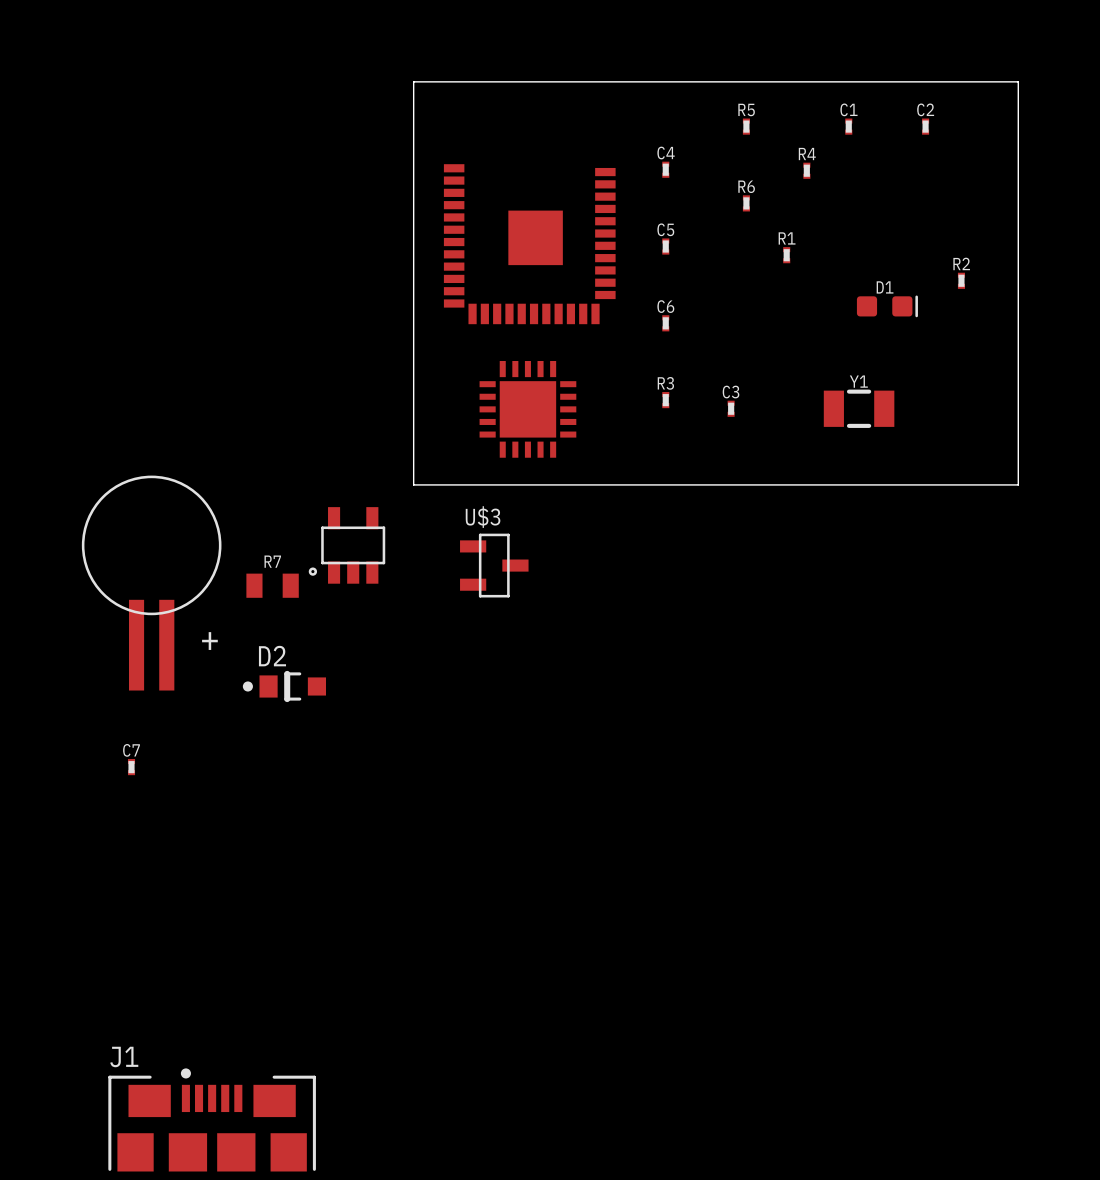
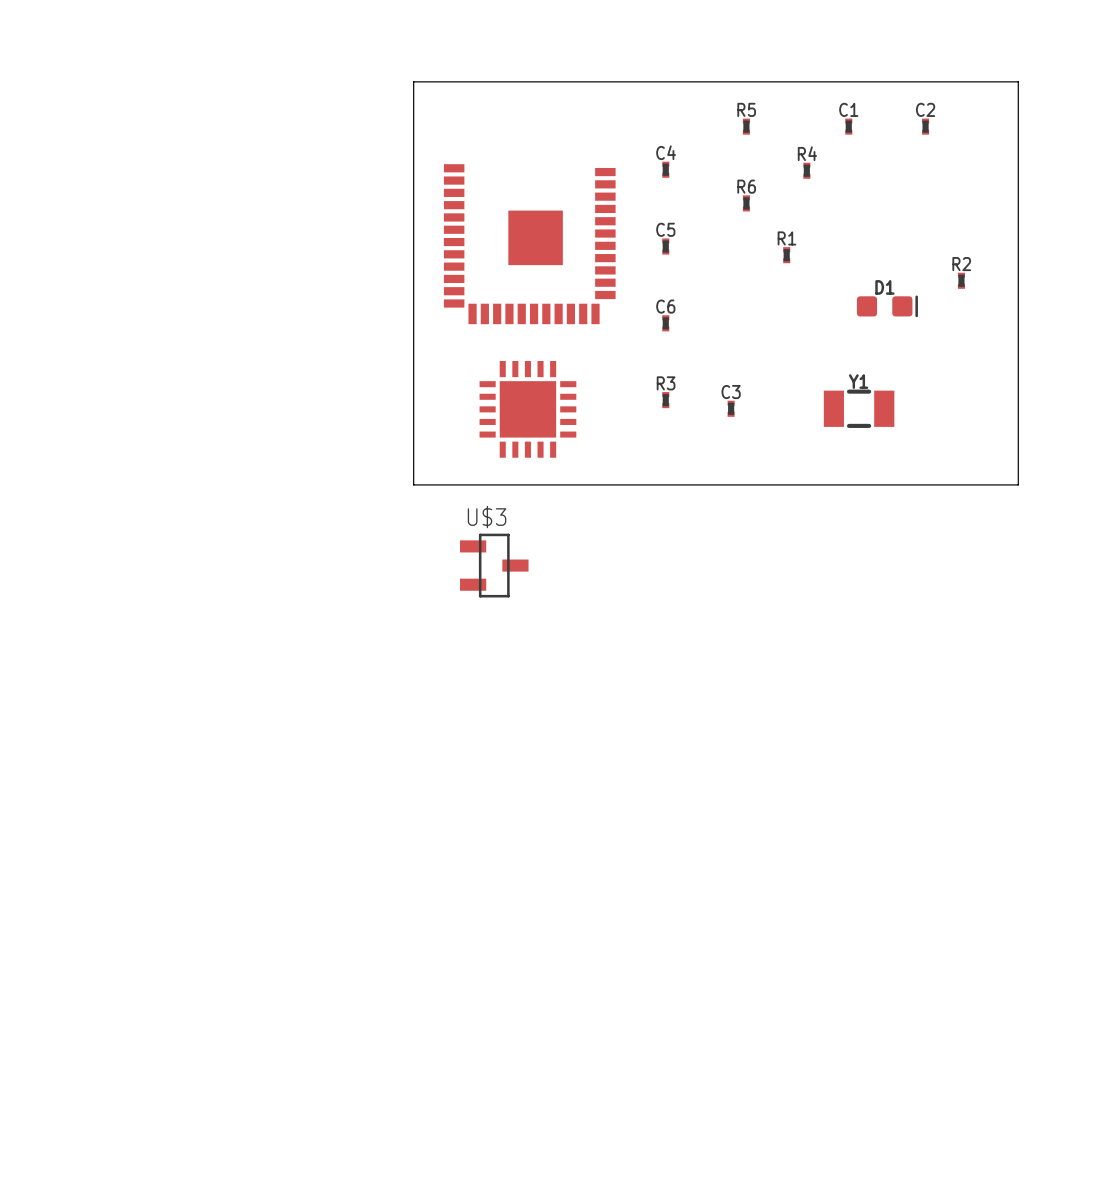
part: (346, 545) -> none
part: (151, 583) -> none
R7: (272, 585) -> none
D2: (284, 686) -> none
C7: (131, 767) -> none
J1: (212, 1119) -> none

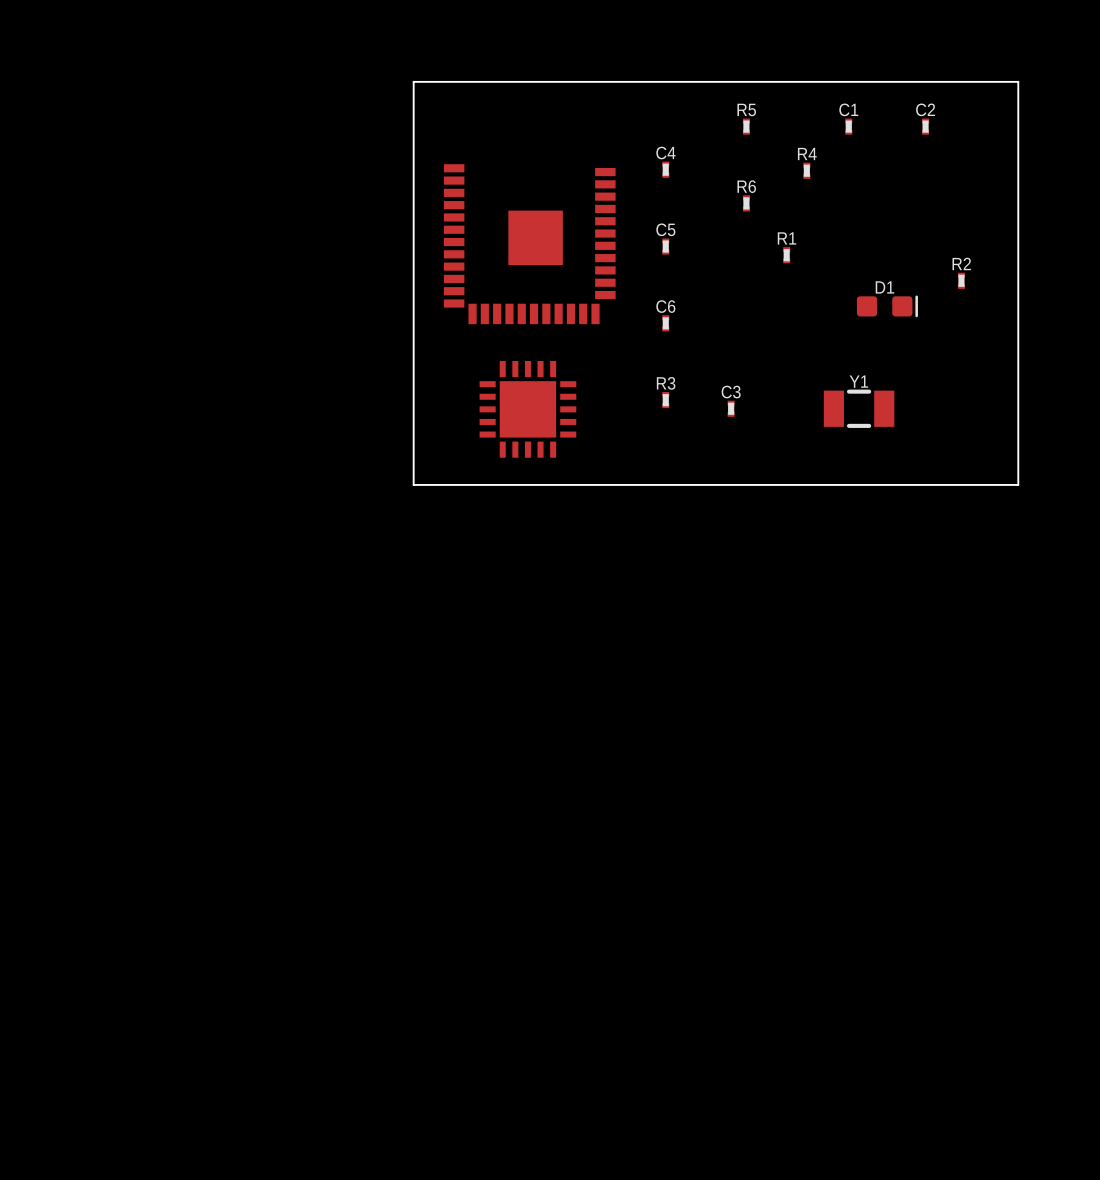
U$3: (494, 565) -> none

